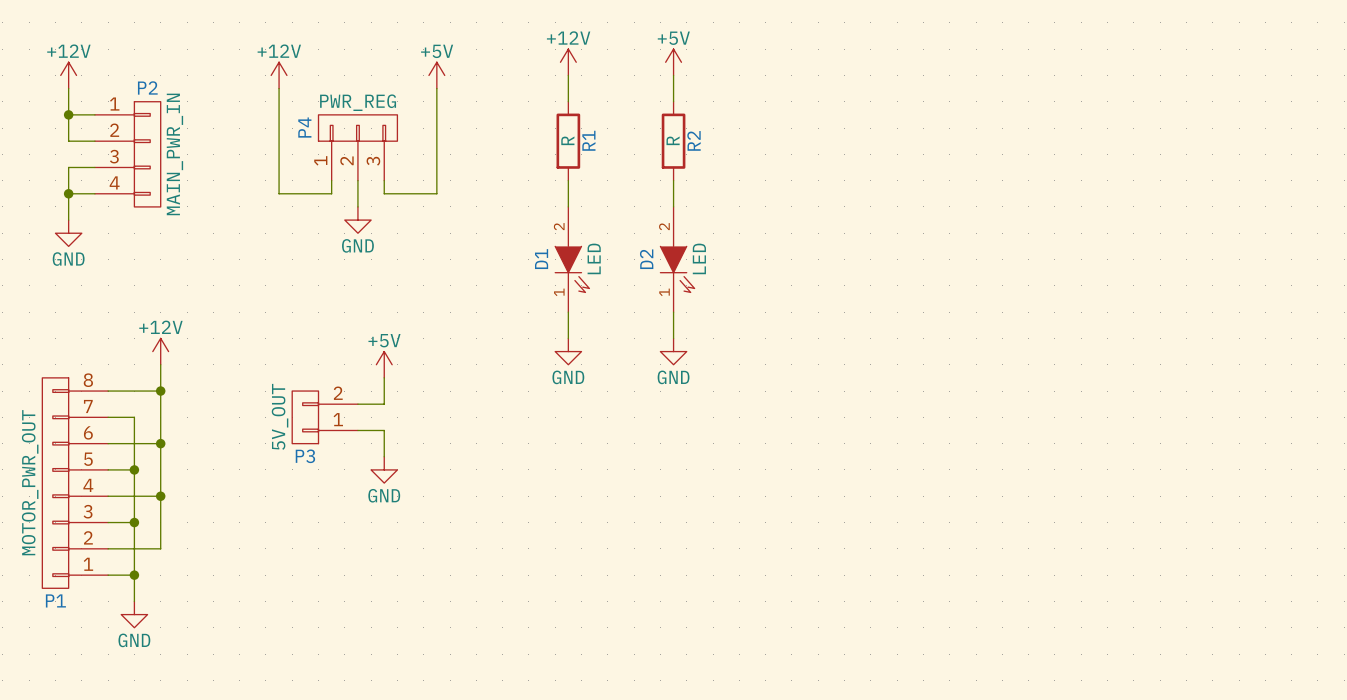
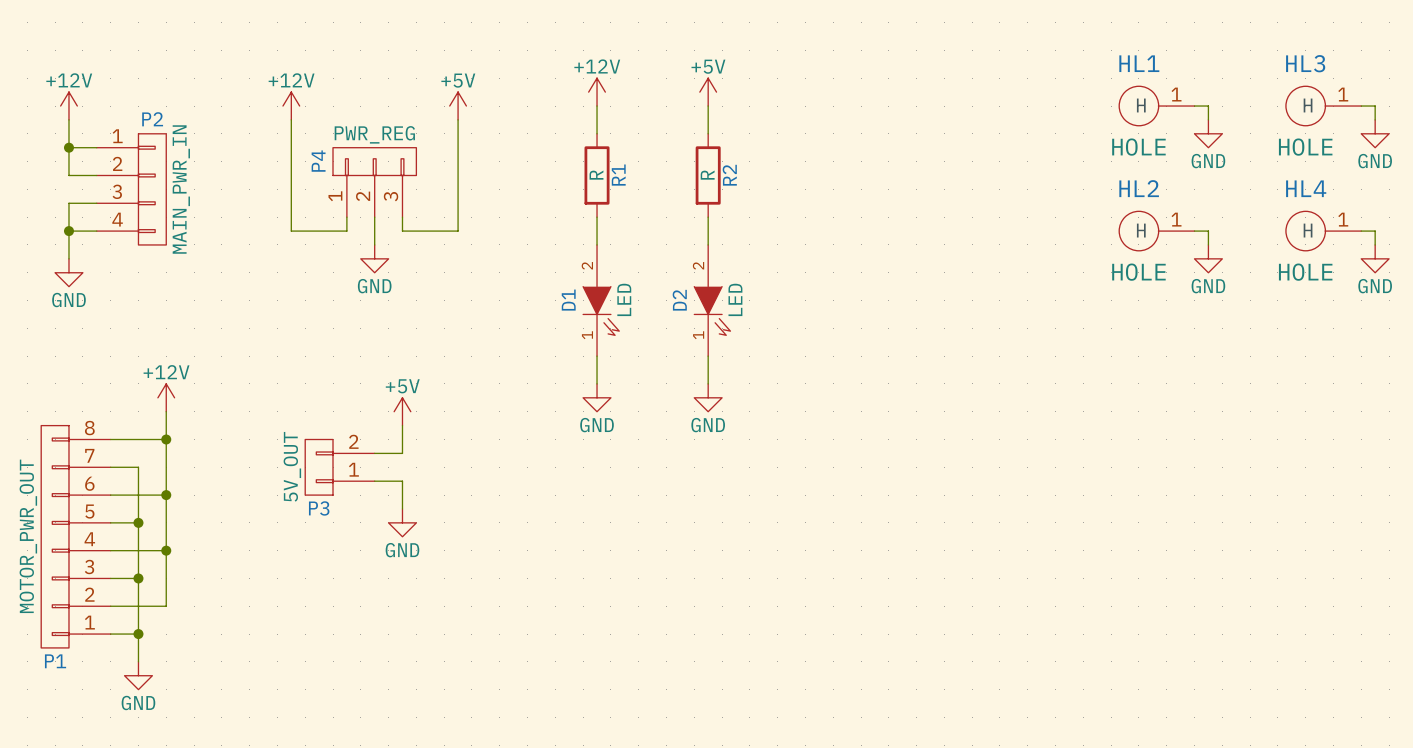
HL1: none -> HOLE (1156, 106)
wire: none -> (1194, 106) (1208, 106) (1208, 119)
HL3: none -> HOLE (1323, 106)
wire: none -> (1361, 106) (1375, 106) (1375, 119)
power symbol: none -> GND (1208, 133)
power symbol: none -> GND (1375, 133)
HL2: none -> HOLE (1156, 231)
wire: none -> (1194, 231) (1208, 231) (1208, 244)
HL4: none -> HOLE (1323, 231)
wire: none -> (1361, 231) (1375, 231) (1375, 244)
power symbol: none -> GND (1208, 258)
power symbol: none -> GND (1375, 258)

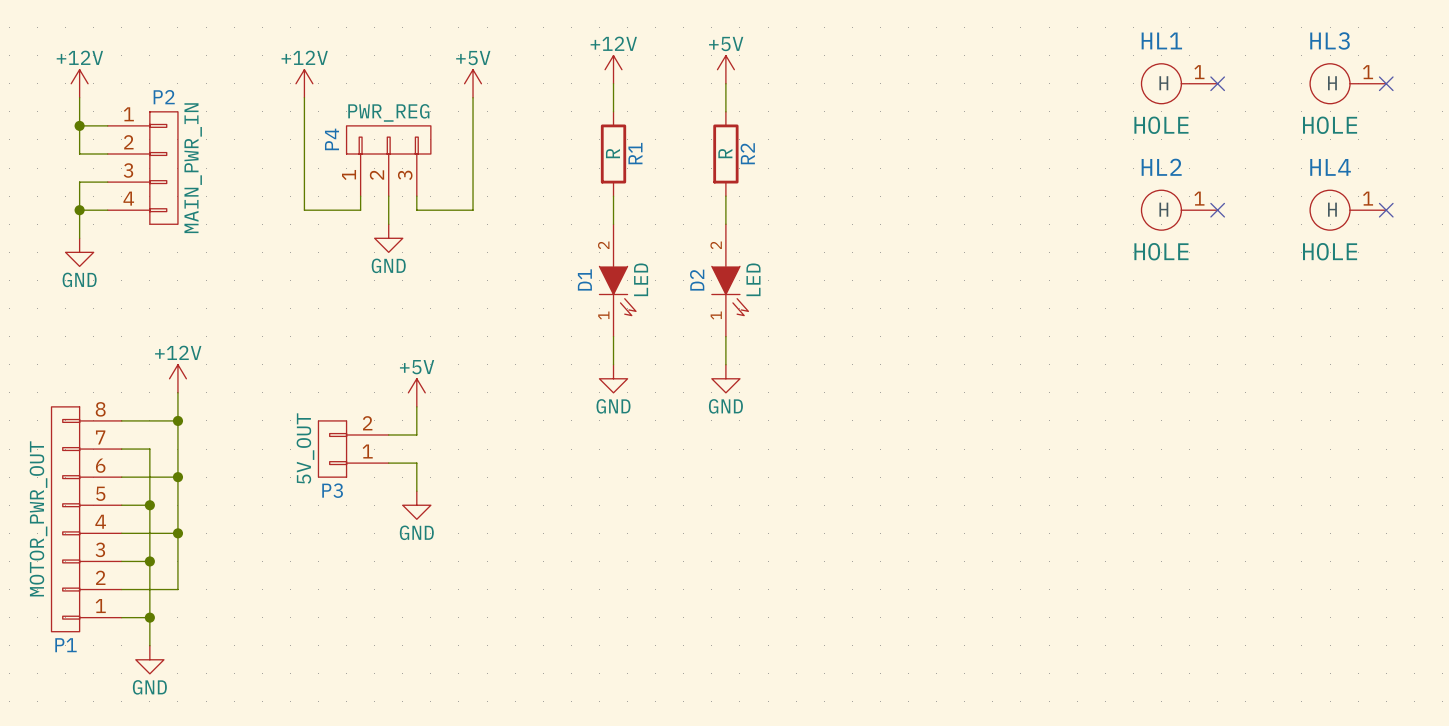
wire: (1194, 106) (1208, 106) (1208, 119) -> none
no-connect mark: none -> (1217, 83)
wire: (1361, 106) (1375, 106) (1375, 119) -> none
no-connect mark: none -> (1386, 83)
power symbol: GND (1208, 133) -> none
power symbol: GND (1375, 133) -> none
wire: (1194, 231) (1208, 231) (1208, 244) -> none
no-connect mark: none -> (1217, 210)
wire: (1361, 231) (1375, 231) (1375, 244) -> none
no-connect mark: none -> (1386, 210)
power symbol: GND (1208, 258) -> none
power symbol: GND (1375, 258) -> none

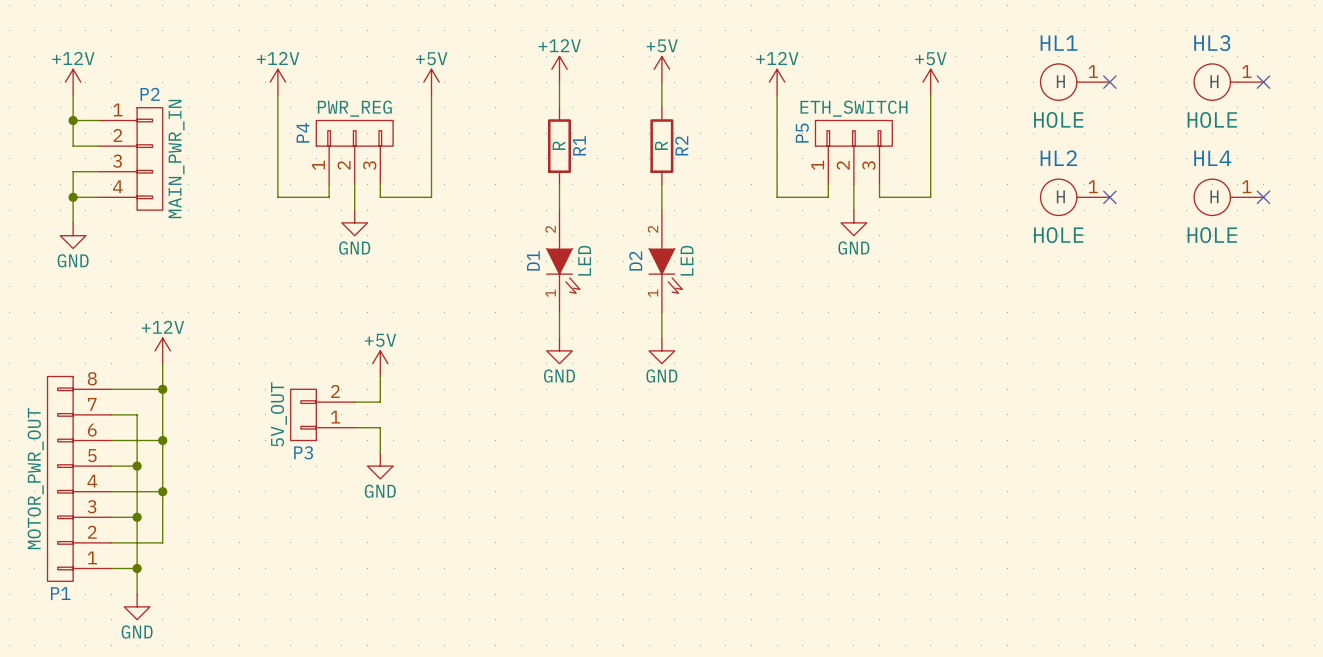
power symbol: none -> +12V (777, 82)
power symbol: none -> +5V (930, 82)
wire: none -> (777, 94) (777, 197) (828, 197) (828, 184)
wire: none -> (930, 94) (930, 197) (879, 197) (879, 184)
P5: none -> ETH_SWITCH (853, 152)
wire: none -> (853, 184) (853, 210)
power symbol: none -> GND (853, 222)

